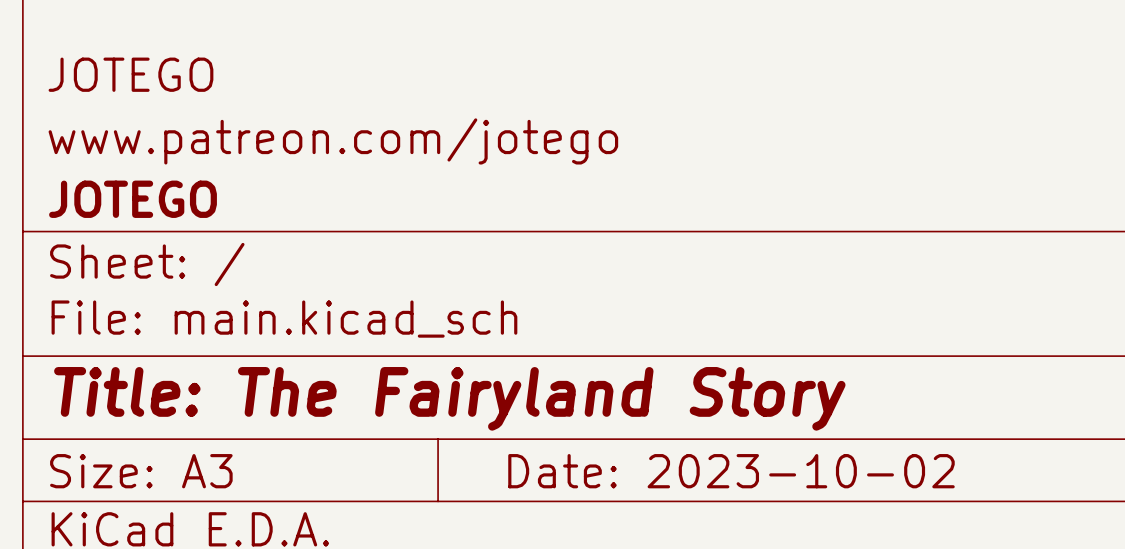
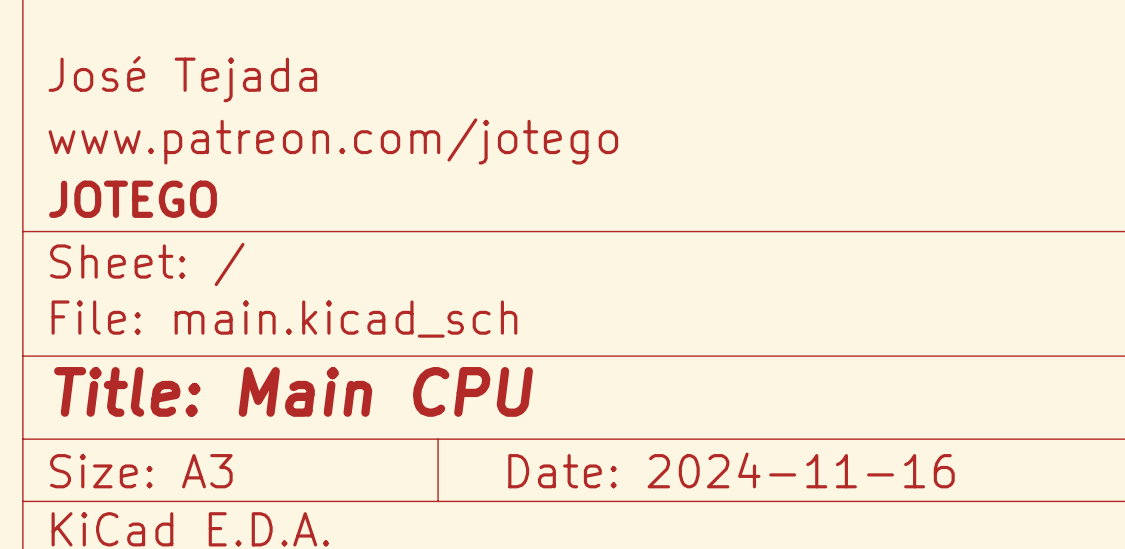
title block: JOTEGO (130, 74) -> José Tejada (182, 79)
title block: Title: The Fairyland Story (449, 398) -> Title: Main CPU (293, 391)
title block: Date: 2023-10-02 (731, 471) -> Date: 2024-11-16 (731, 470)

